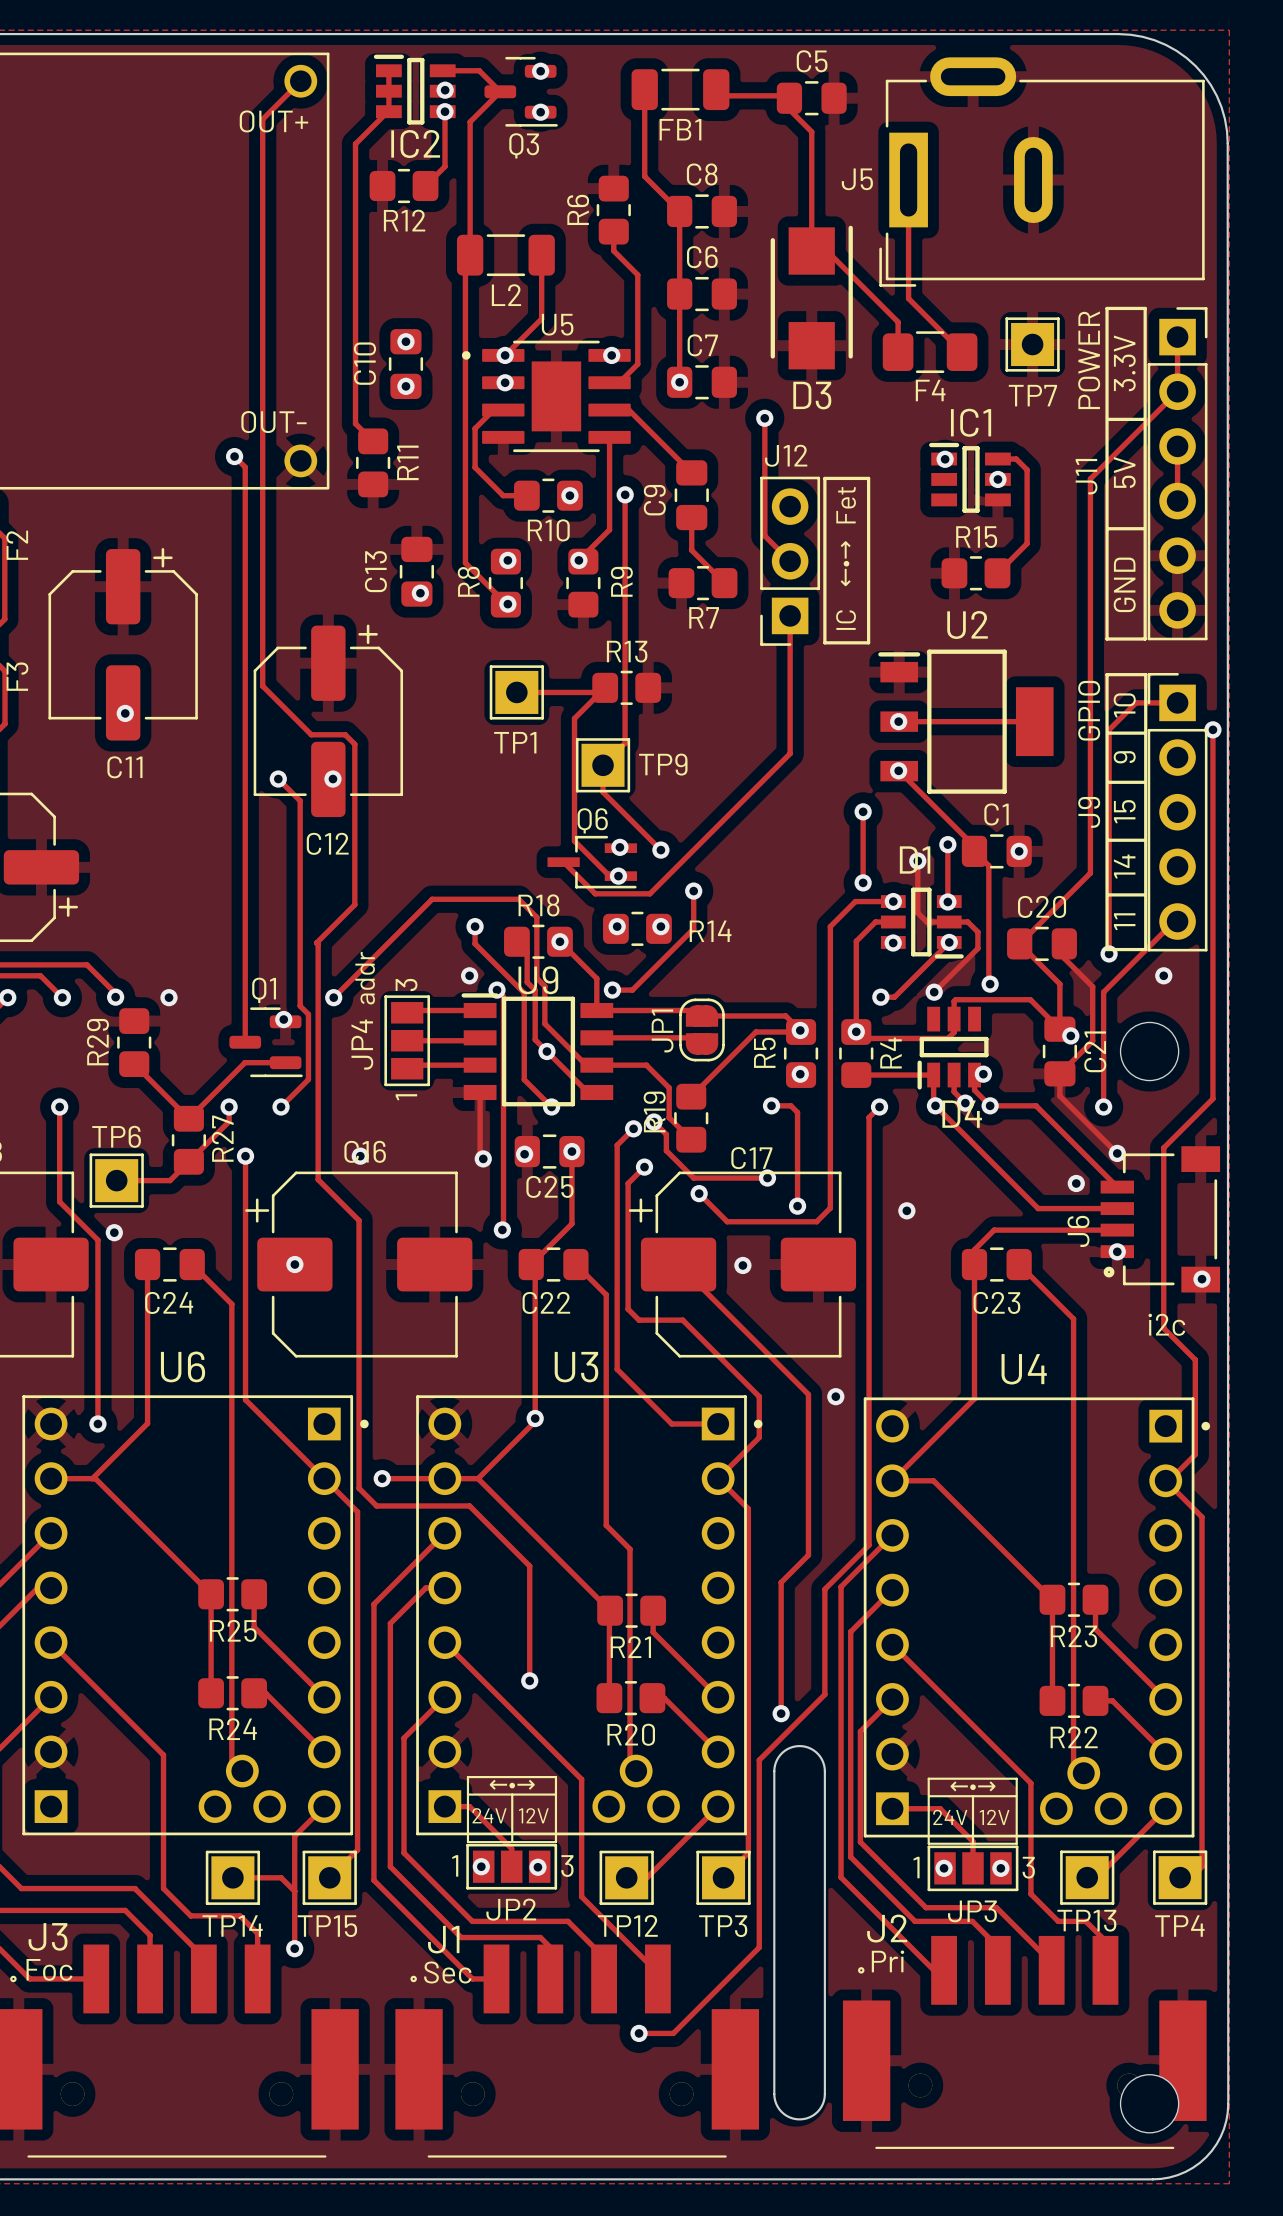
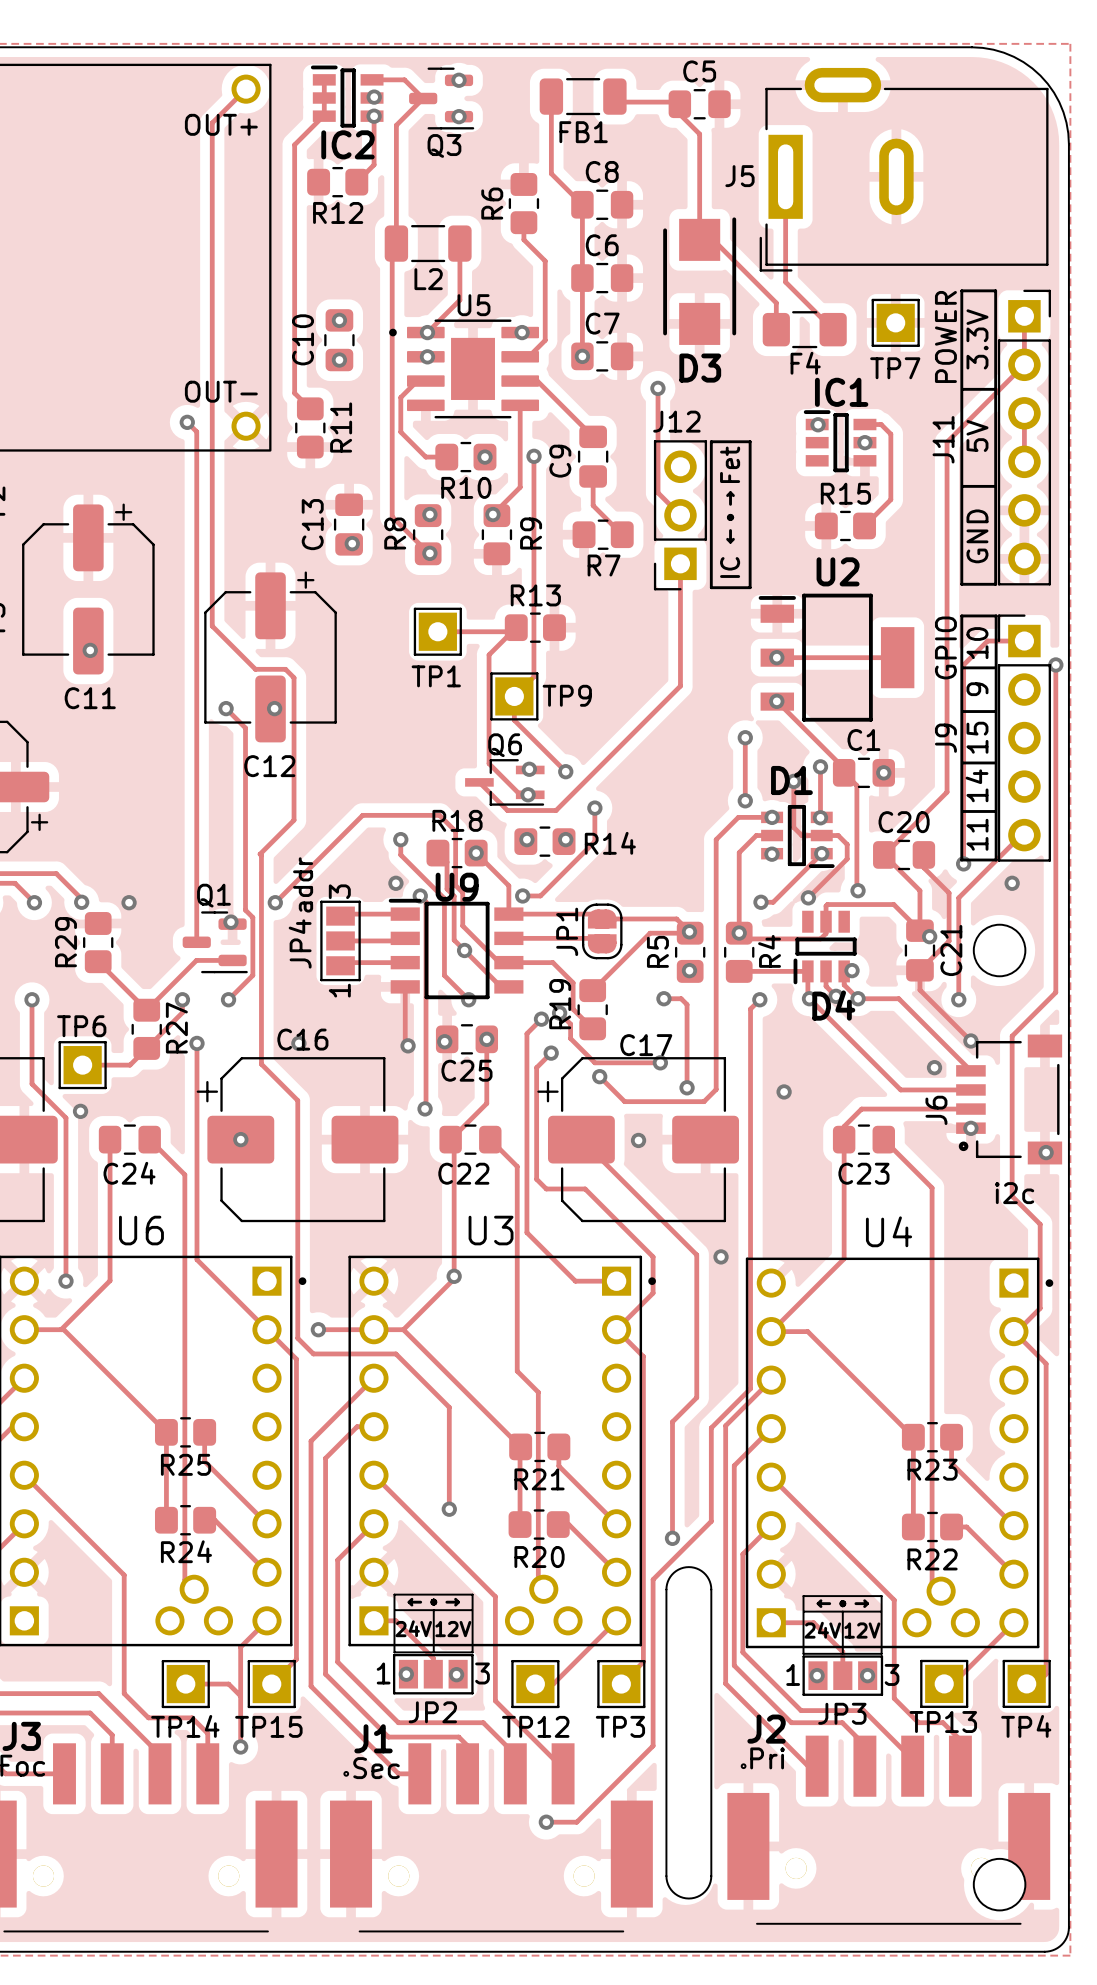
board edge: (1227, 143) (1228, 2103) (1226, 2120) (1220, 2136) (1206, 2157) (1192, 2167) (1177, 2175) (1152, 2179) -> (1068, 144) (1068, 1927) (1063, 1942) (1052, 1950) (1002, 1951)

